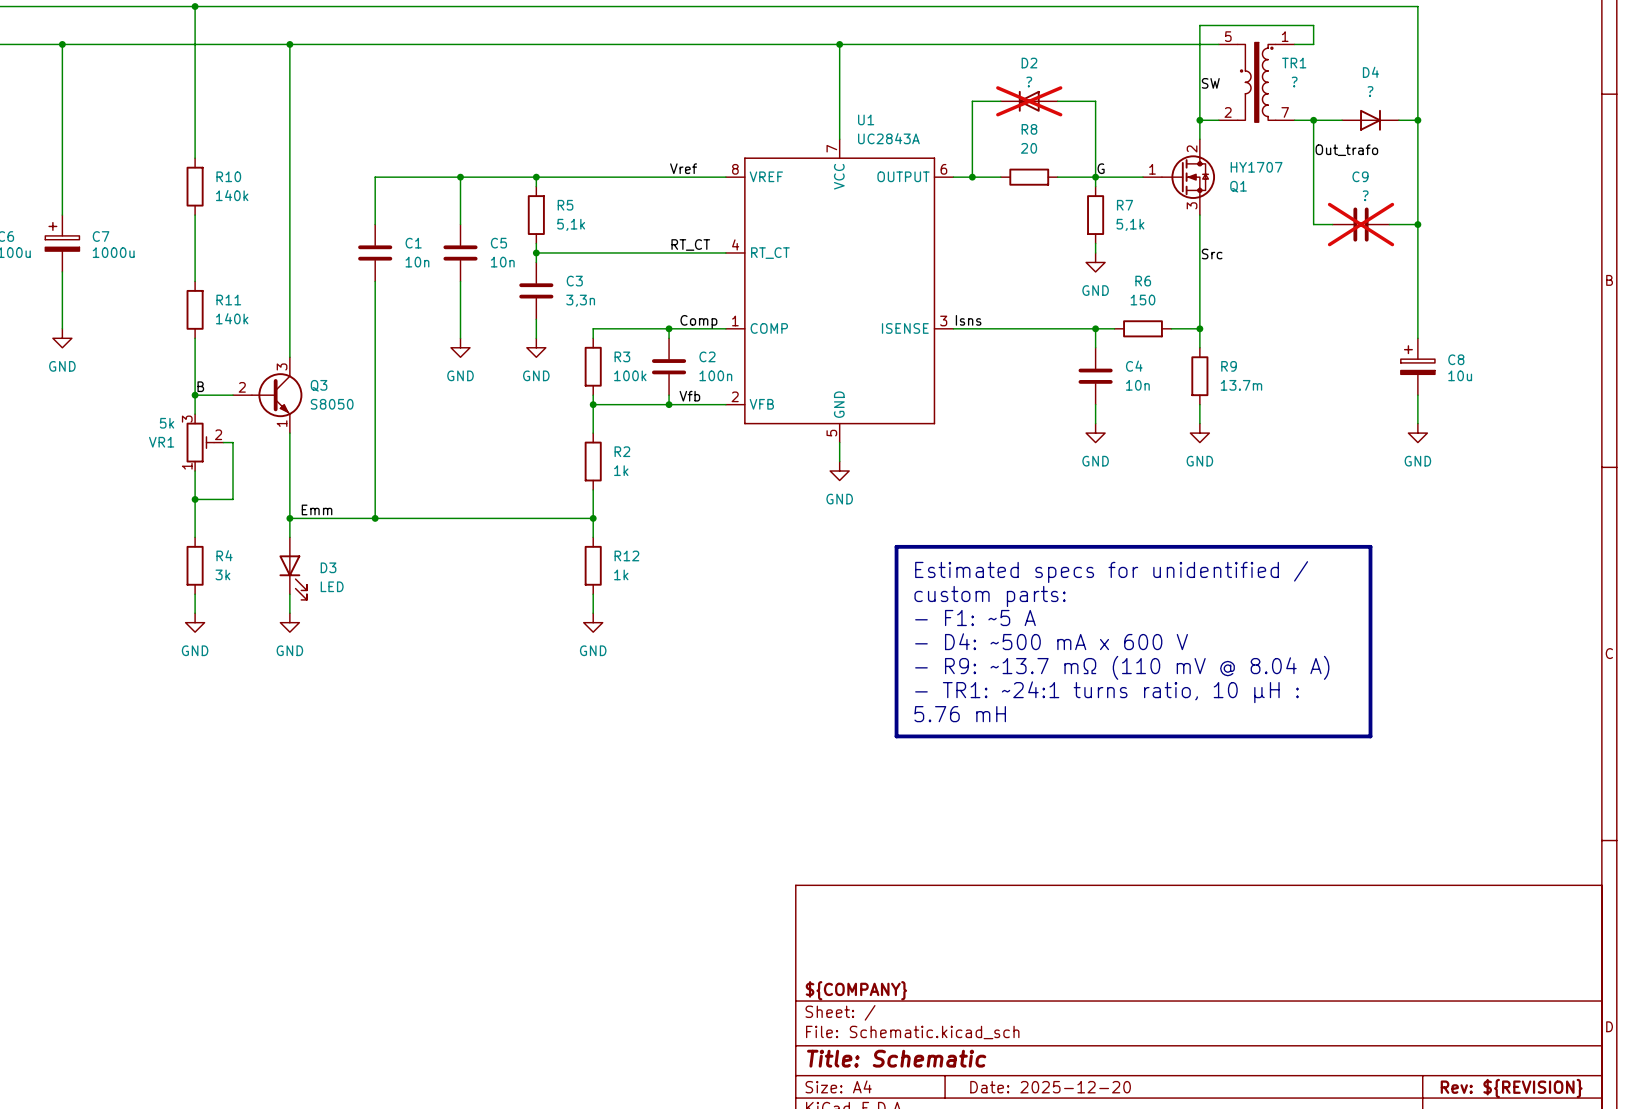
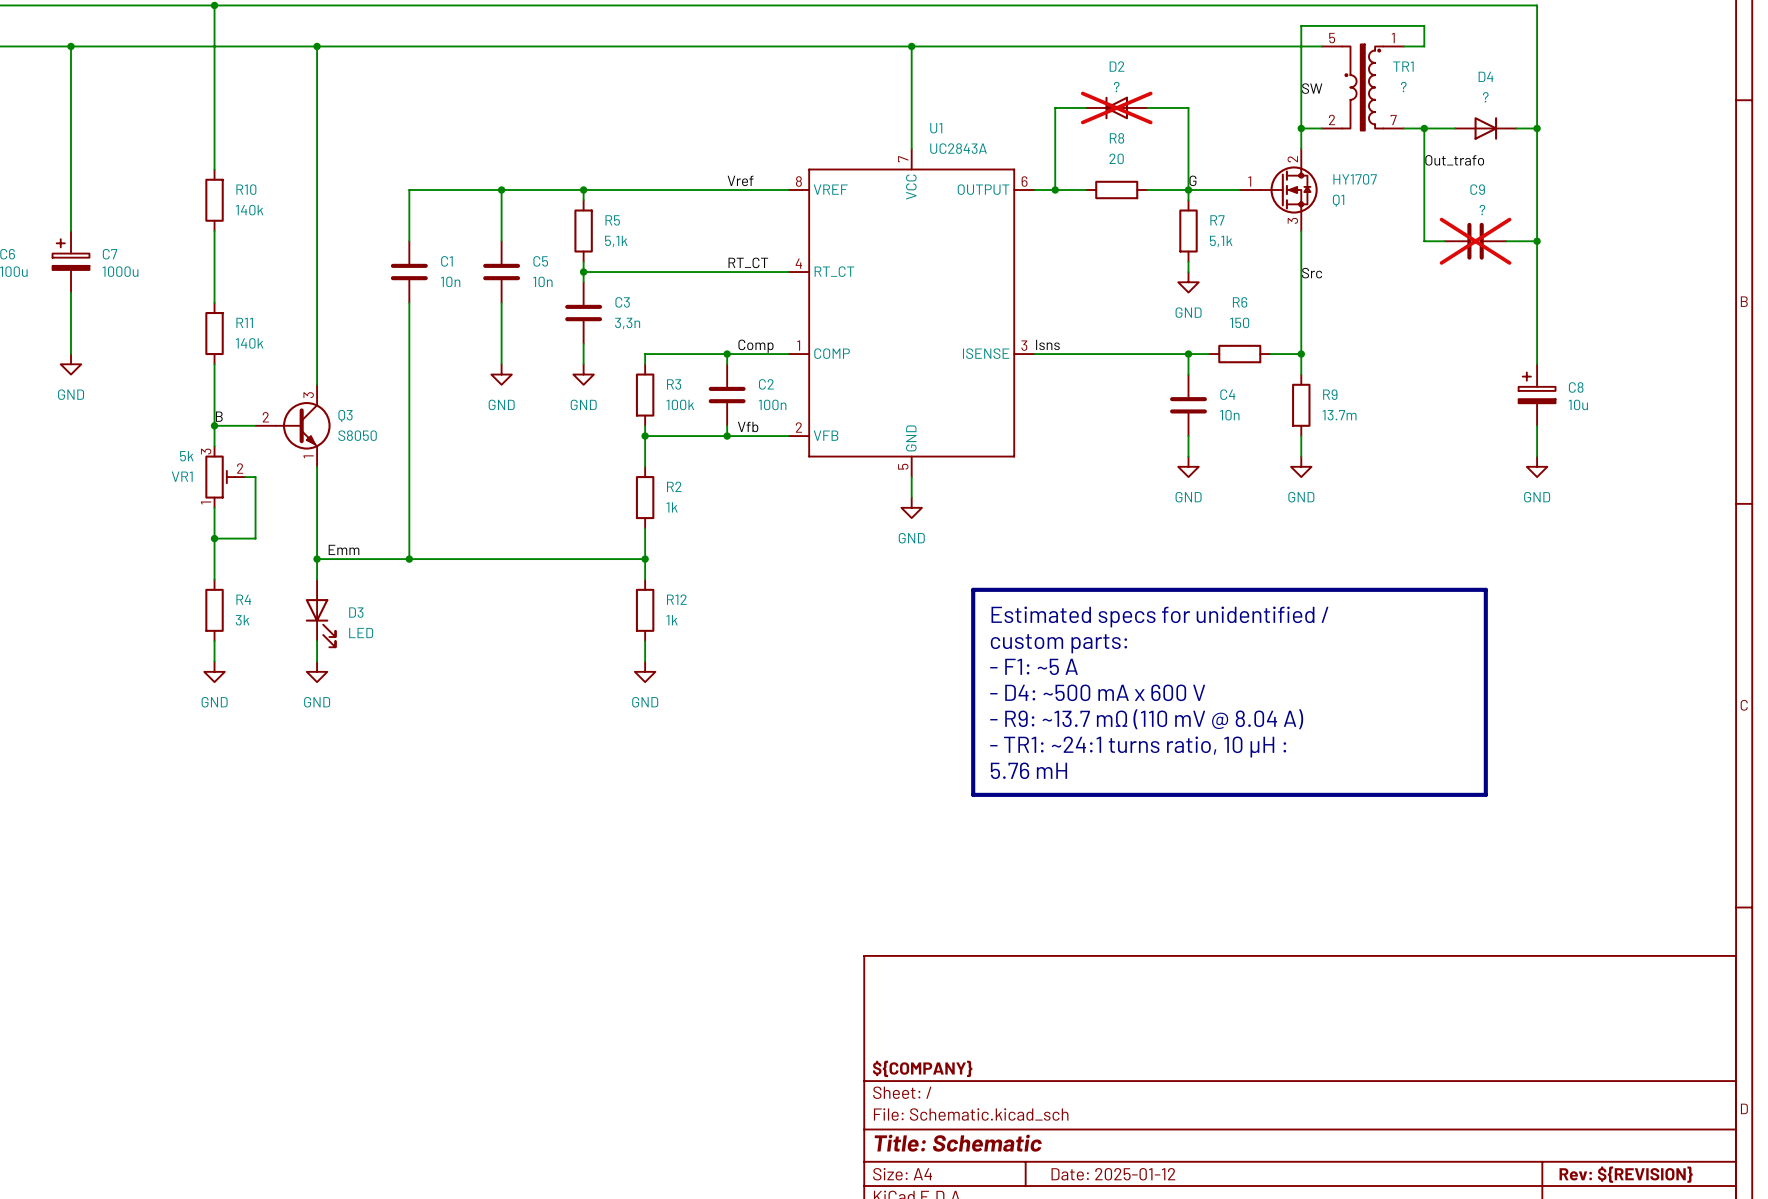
title block: Date: 2025-12-20 (1050, 1087) -> Date: 2025-01-12 (1113, 1174)

